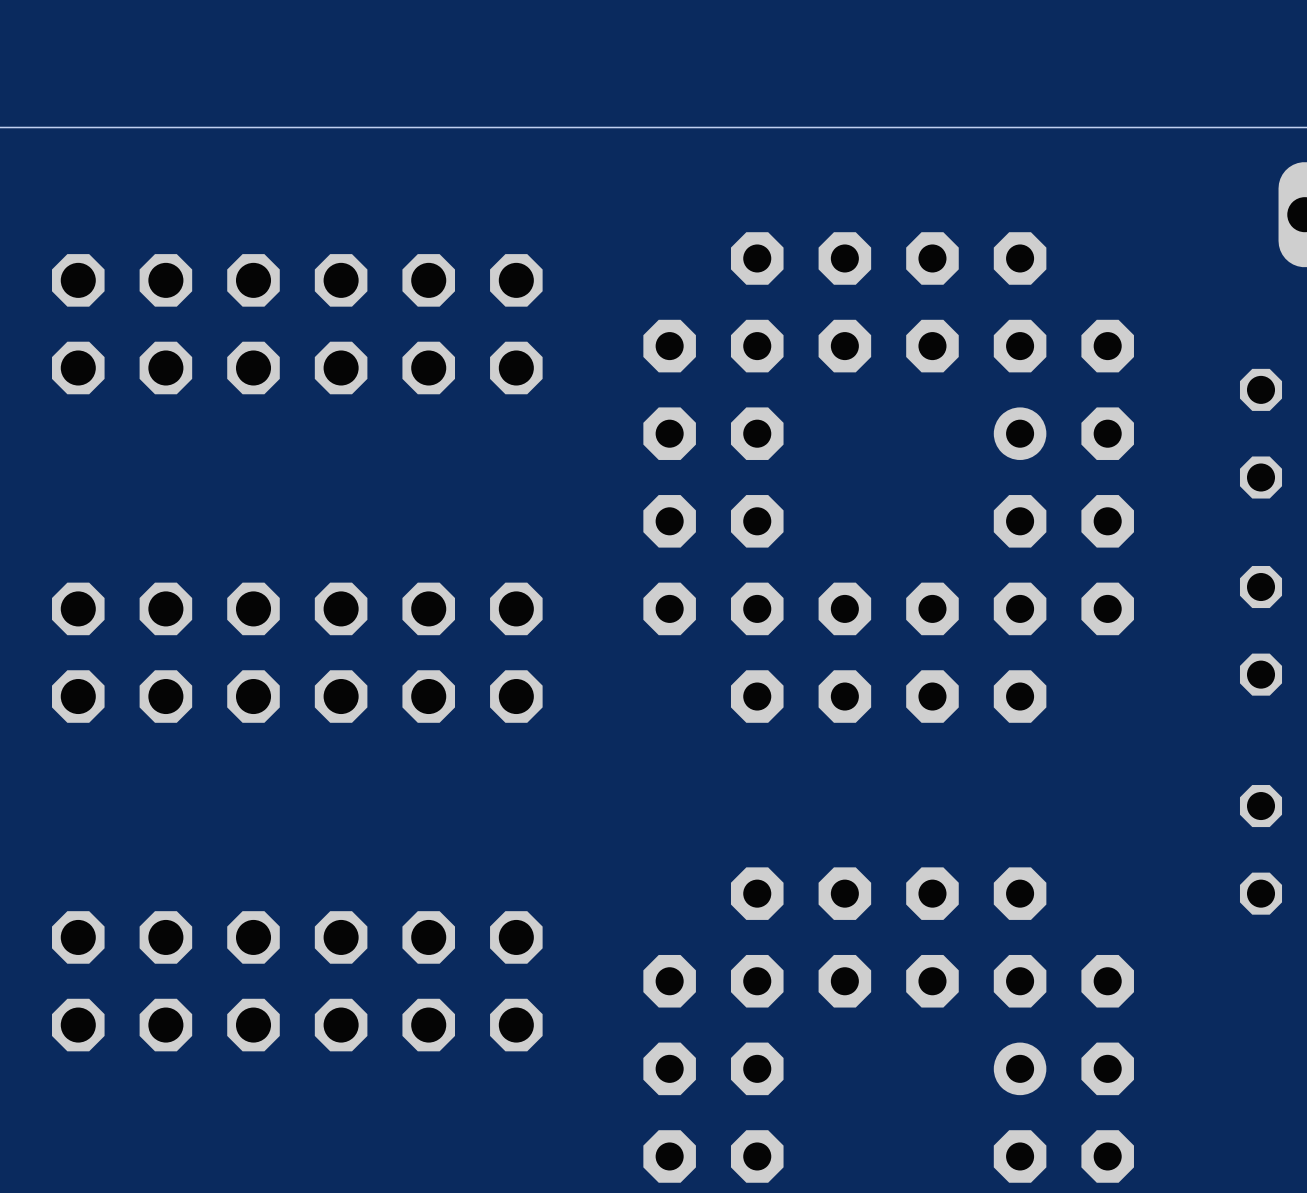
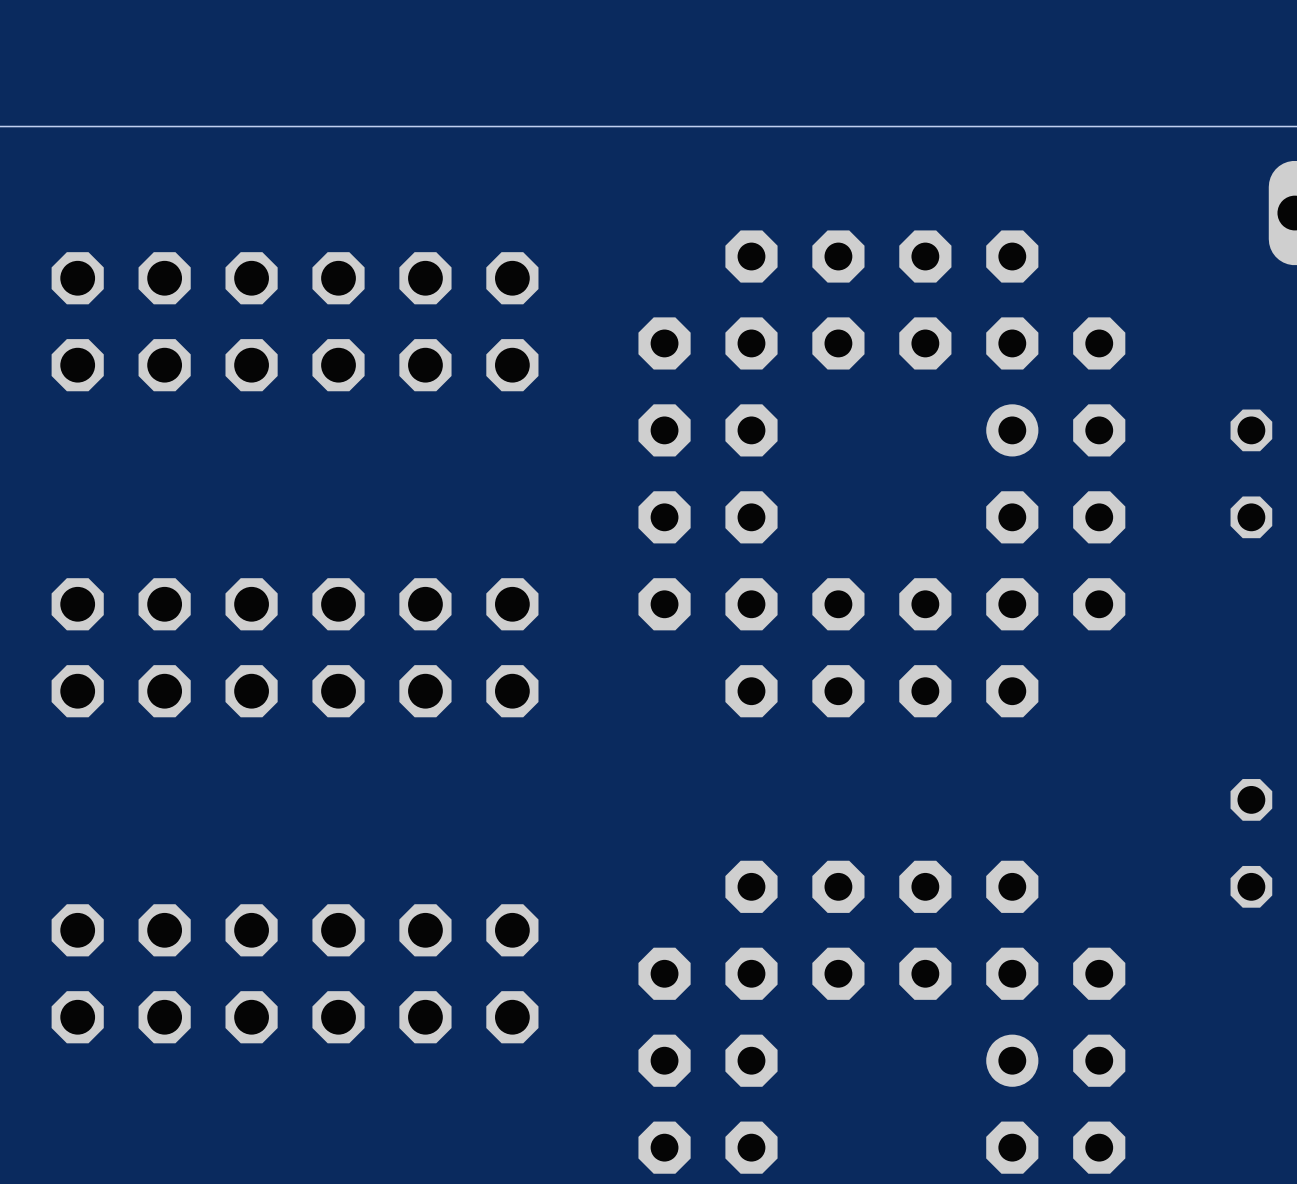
part position: (1261, 433) -> (1251, 473)
part: (1261, 630) -> none

